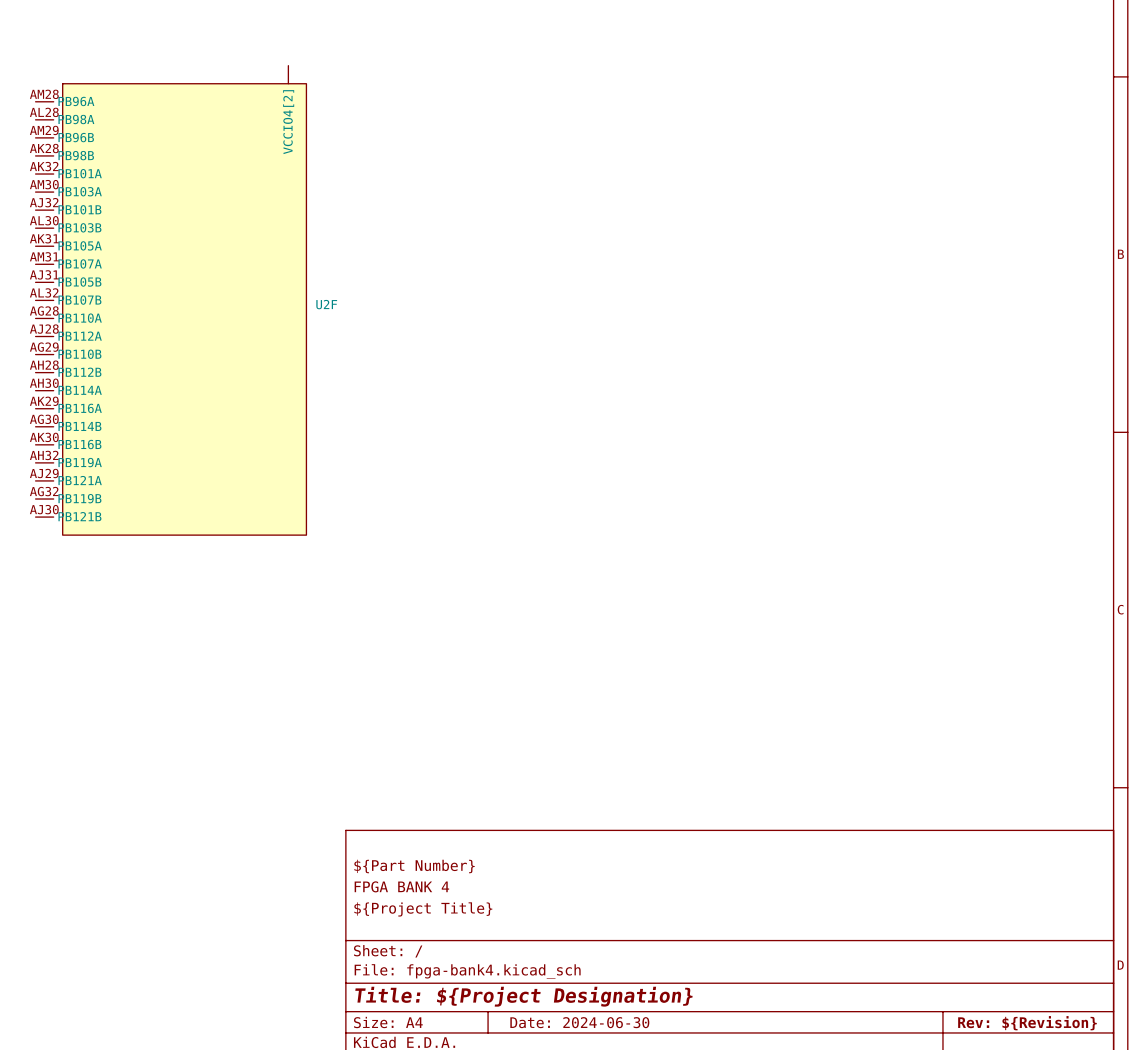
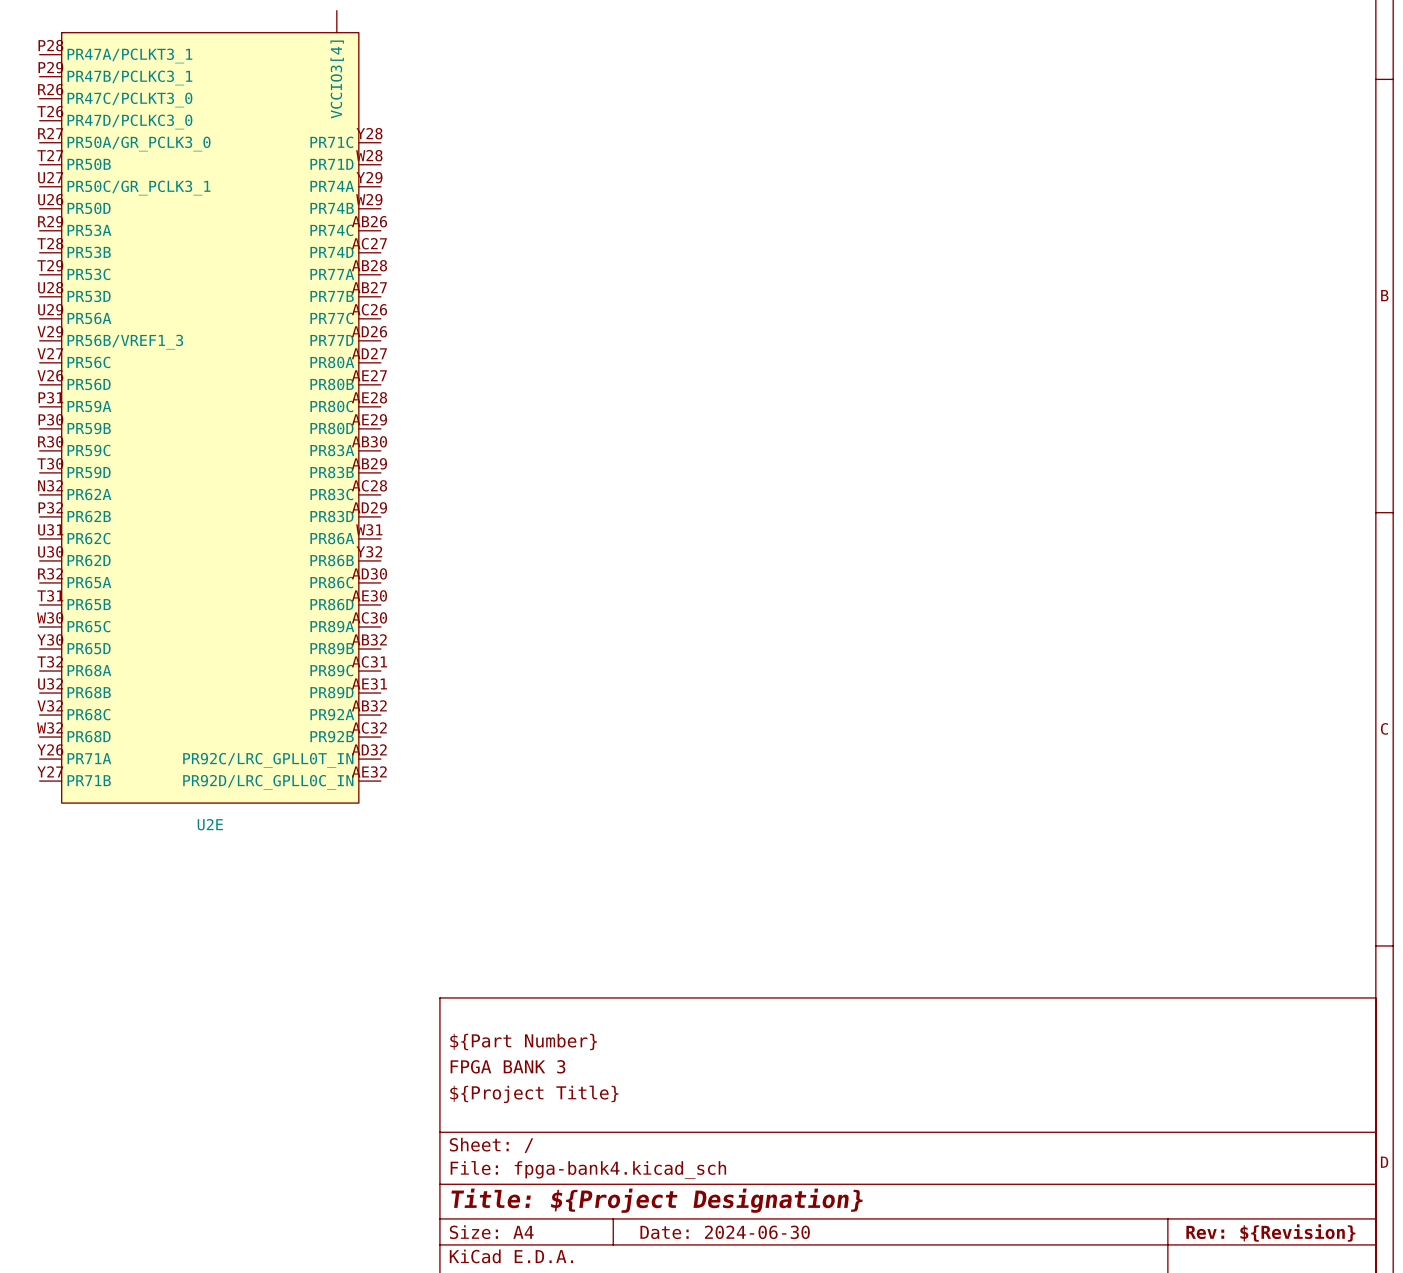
U2F: (171, 300) -> none
U2E: none -> (210, 406)
title block: FPGA BANK 4 (401, 886) -> FPGA BANK 3 (507, 1066)

